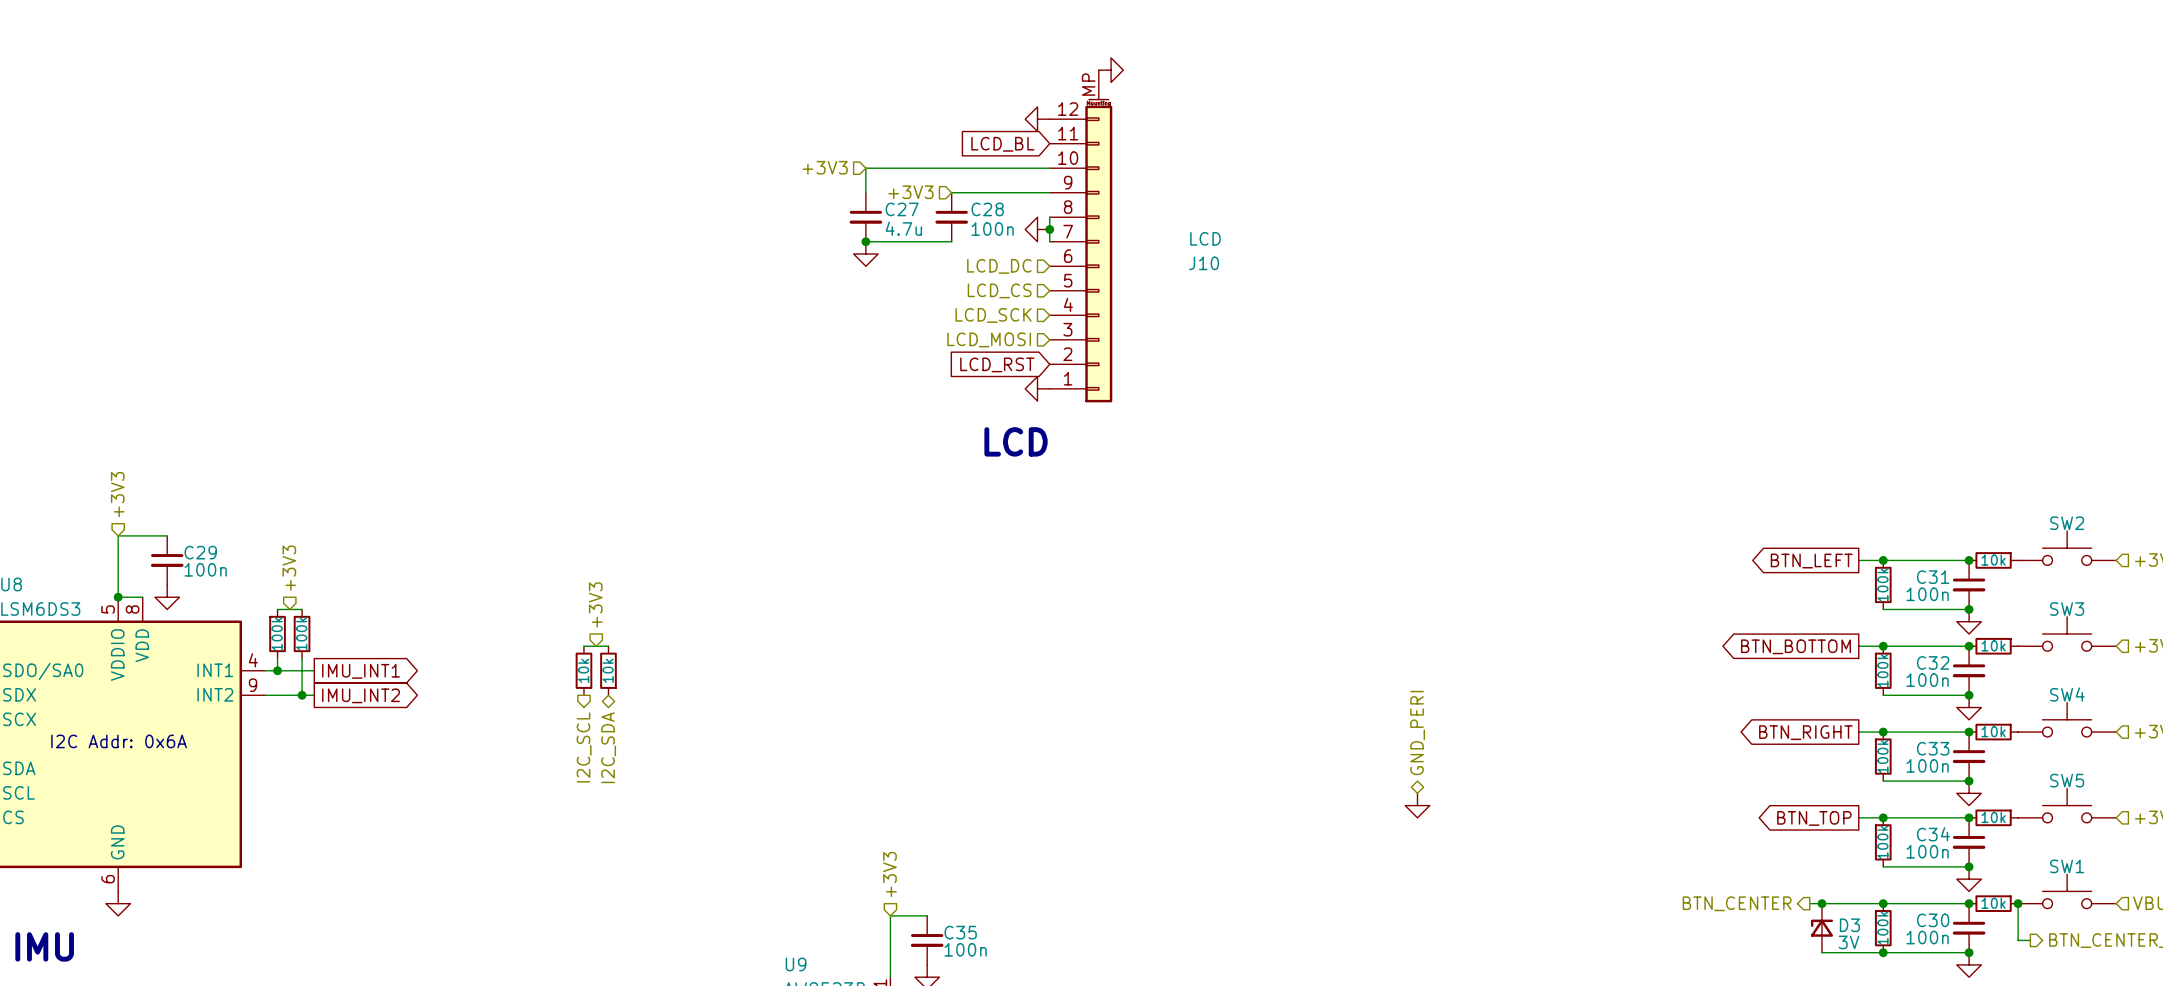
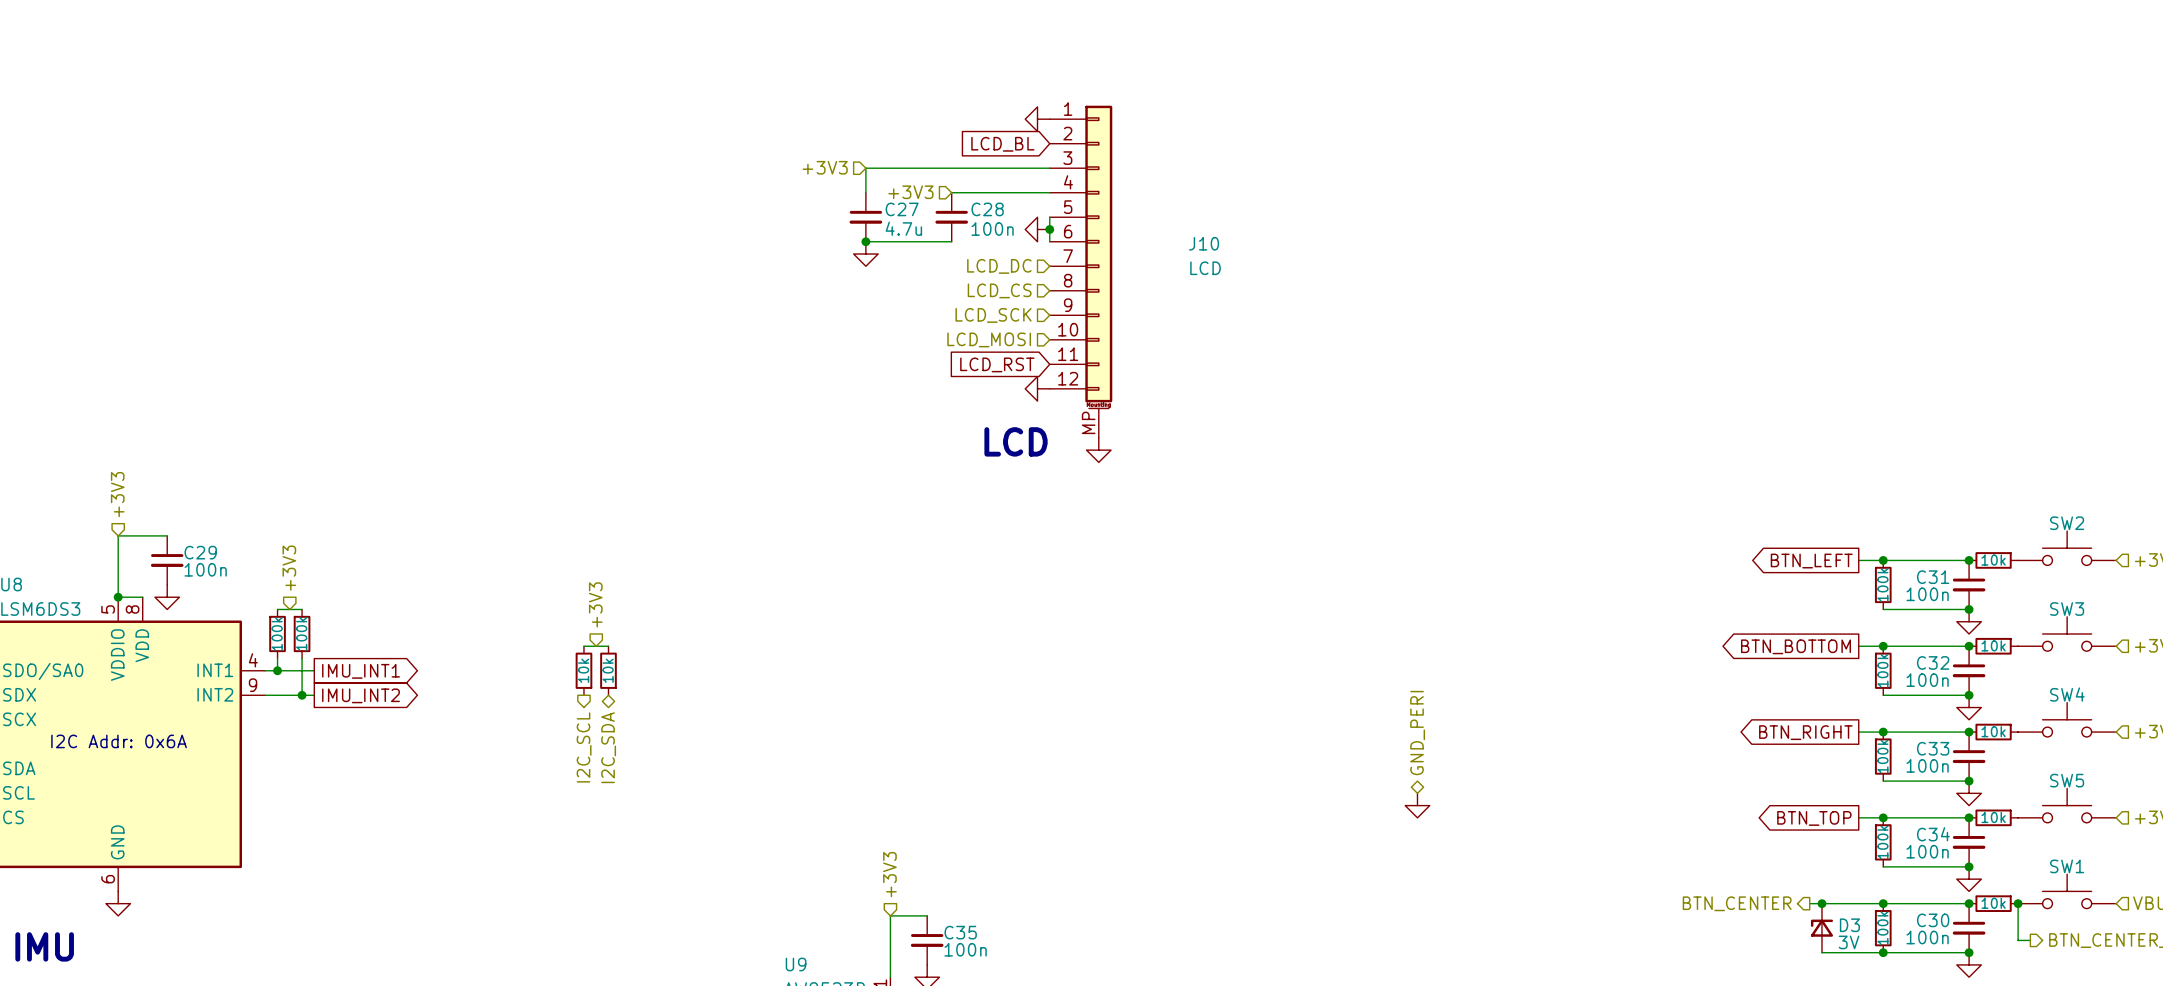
power symbol: (1111, 70) -> none
J10 flip: as is (1098, 250) -> up-down (1098, 257)
power symbol: none -> (1098, 450)

